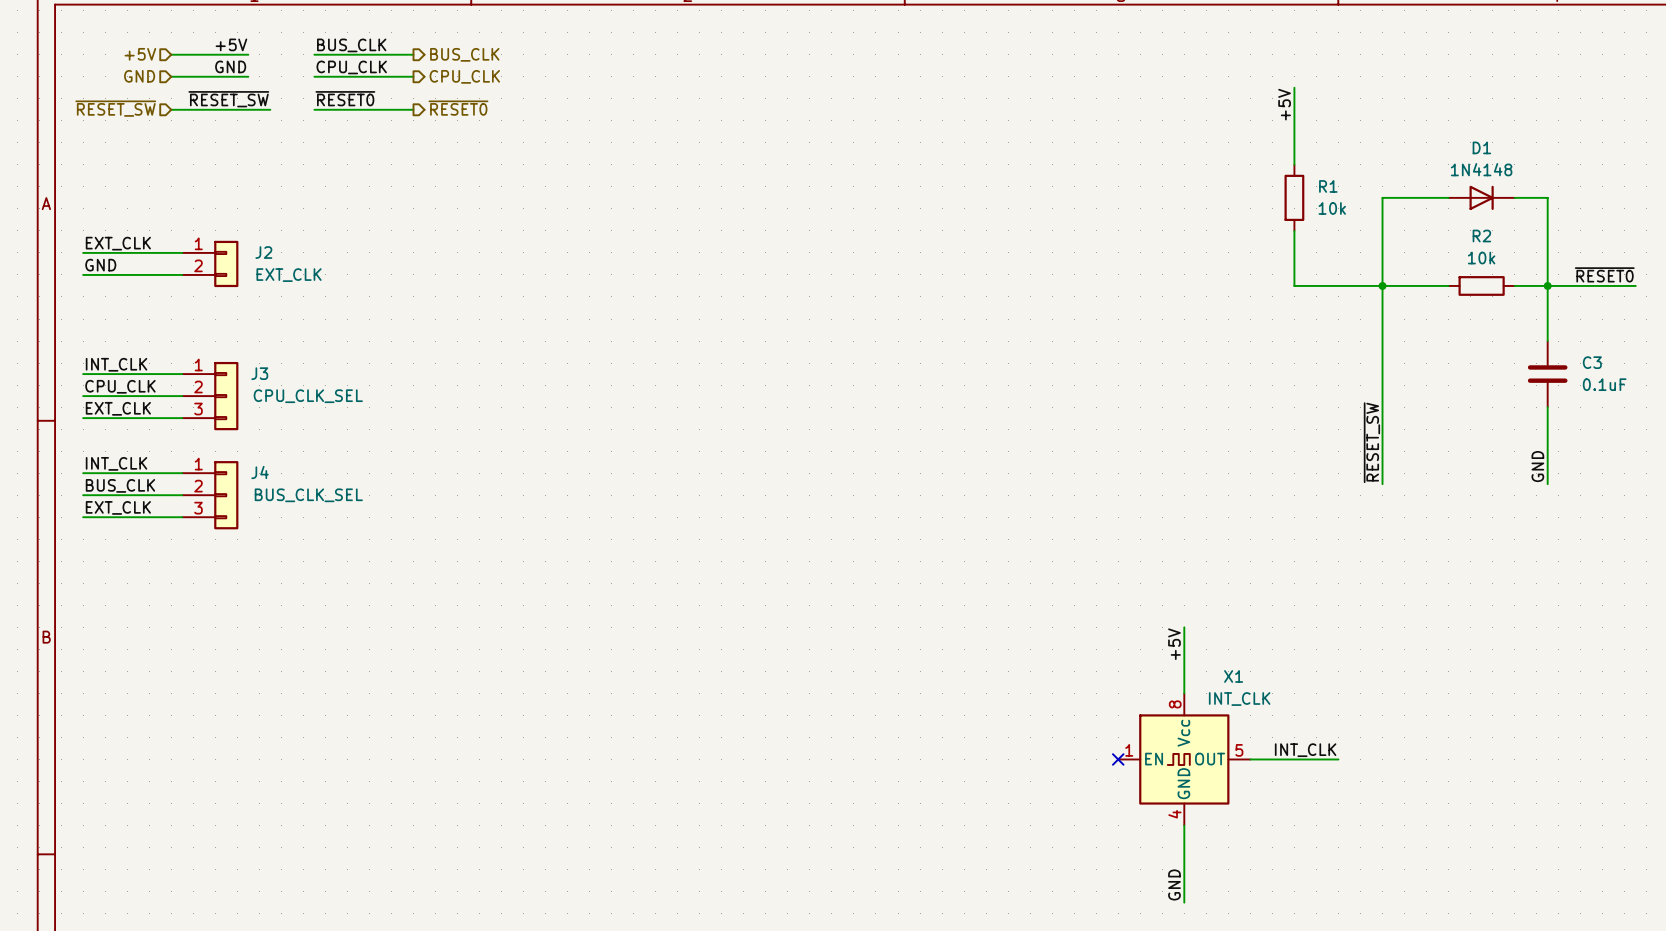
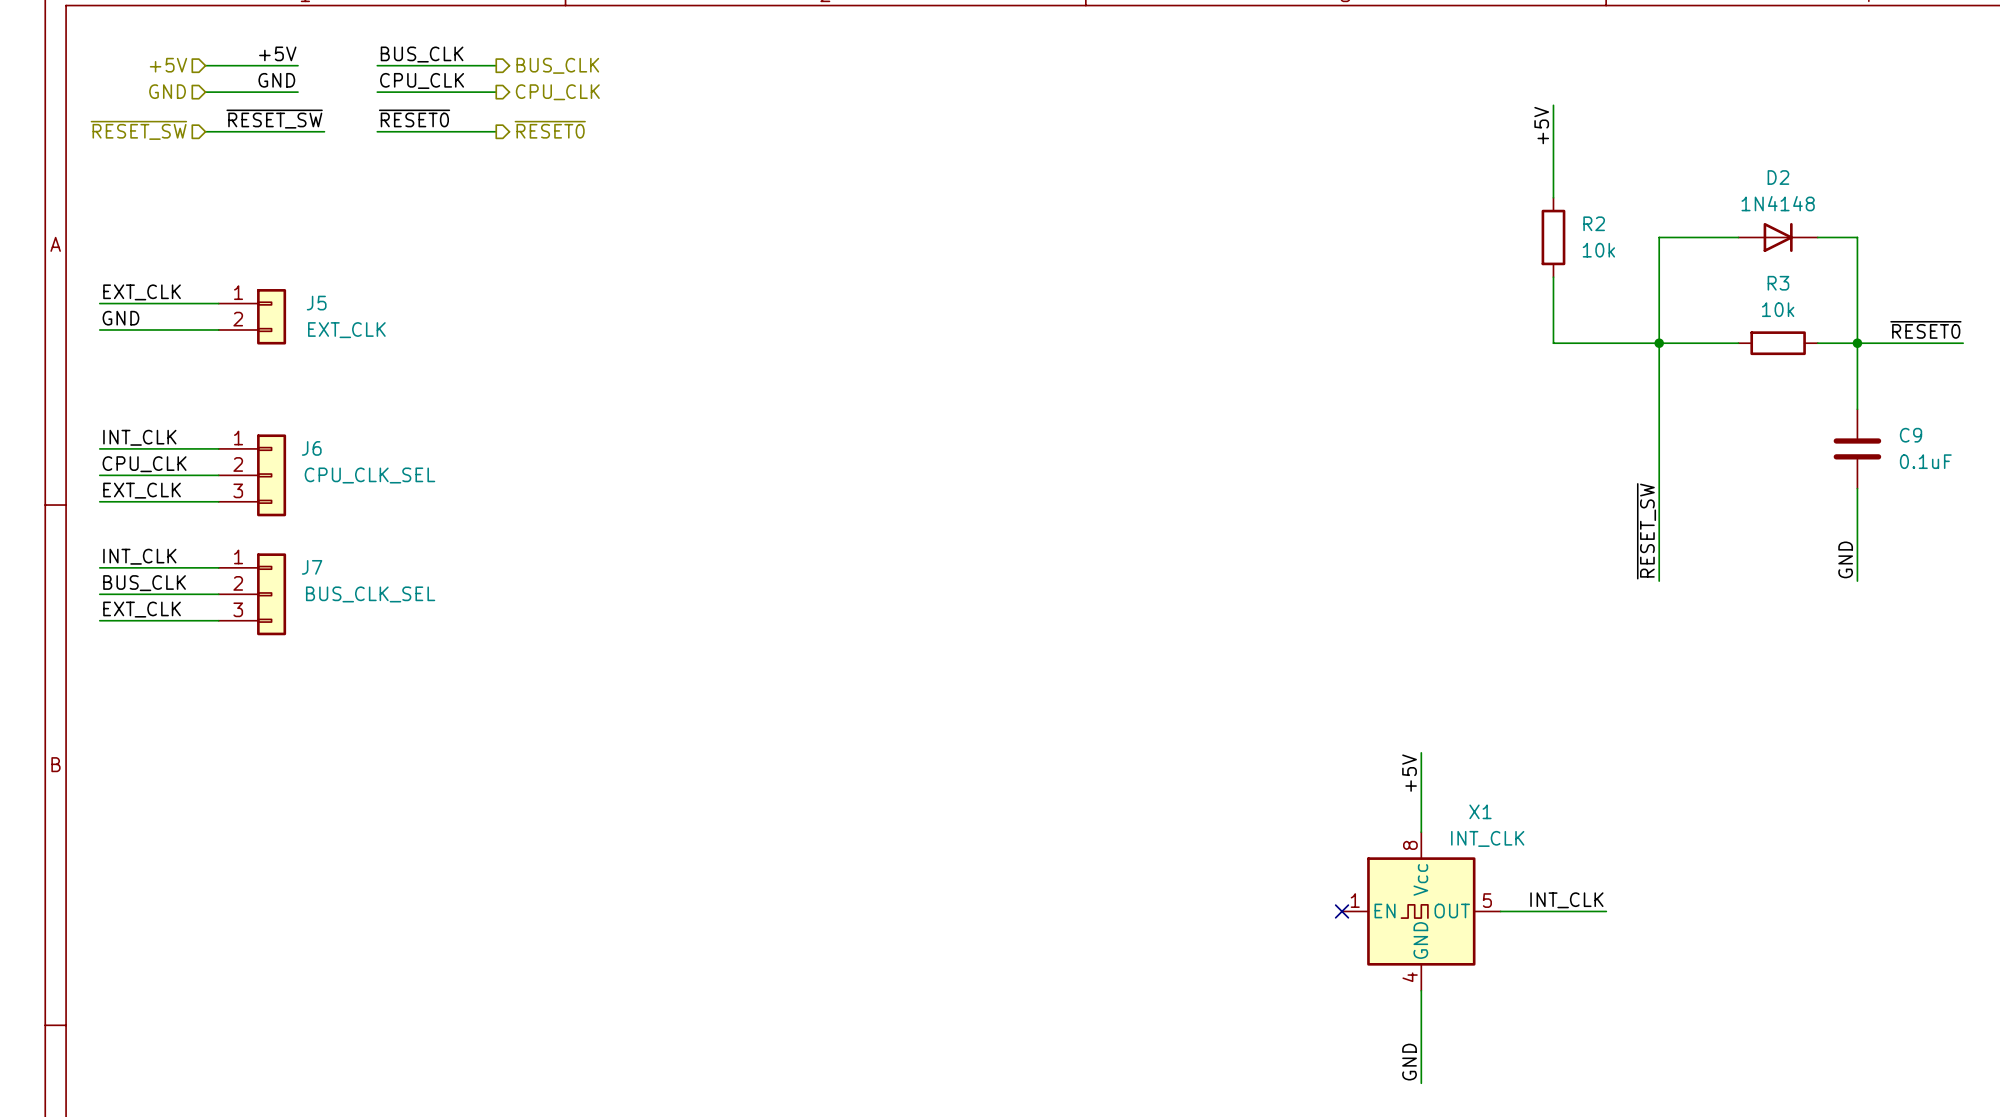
D1 name: D1 (1481, 147) -> D2 (1778, 177)
R1 name: R1 (1328, 186) -> R2 (1594, 223)
R2 name: R2 (1481, 236) -> R3 (1778, 283)
J2 name: J2 (263, 252) -> J5 (316, 303)
C3 name: C3 (1592, 362) -> C9 (1911, 435)
J3 name: J3 (259, 373) -> J6 (311, 448)
J4 name: J4 (260, 472) -> J7 (312, 567)

